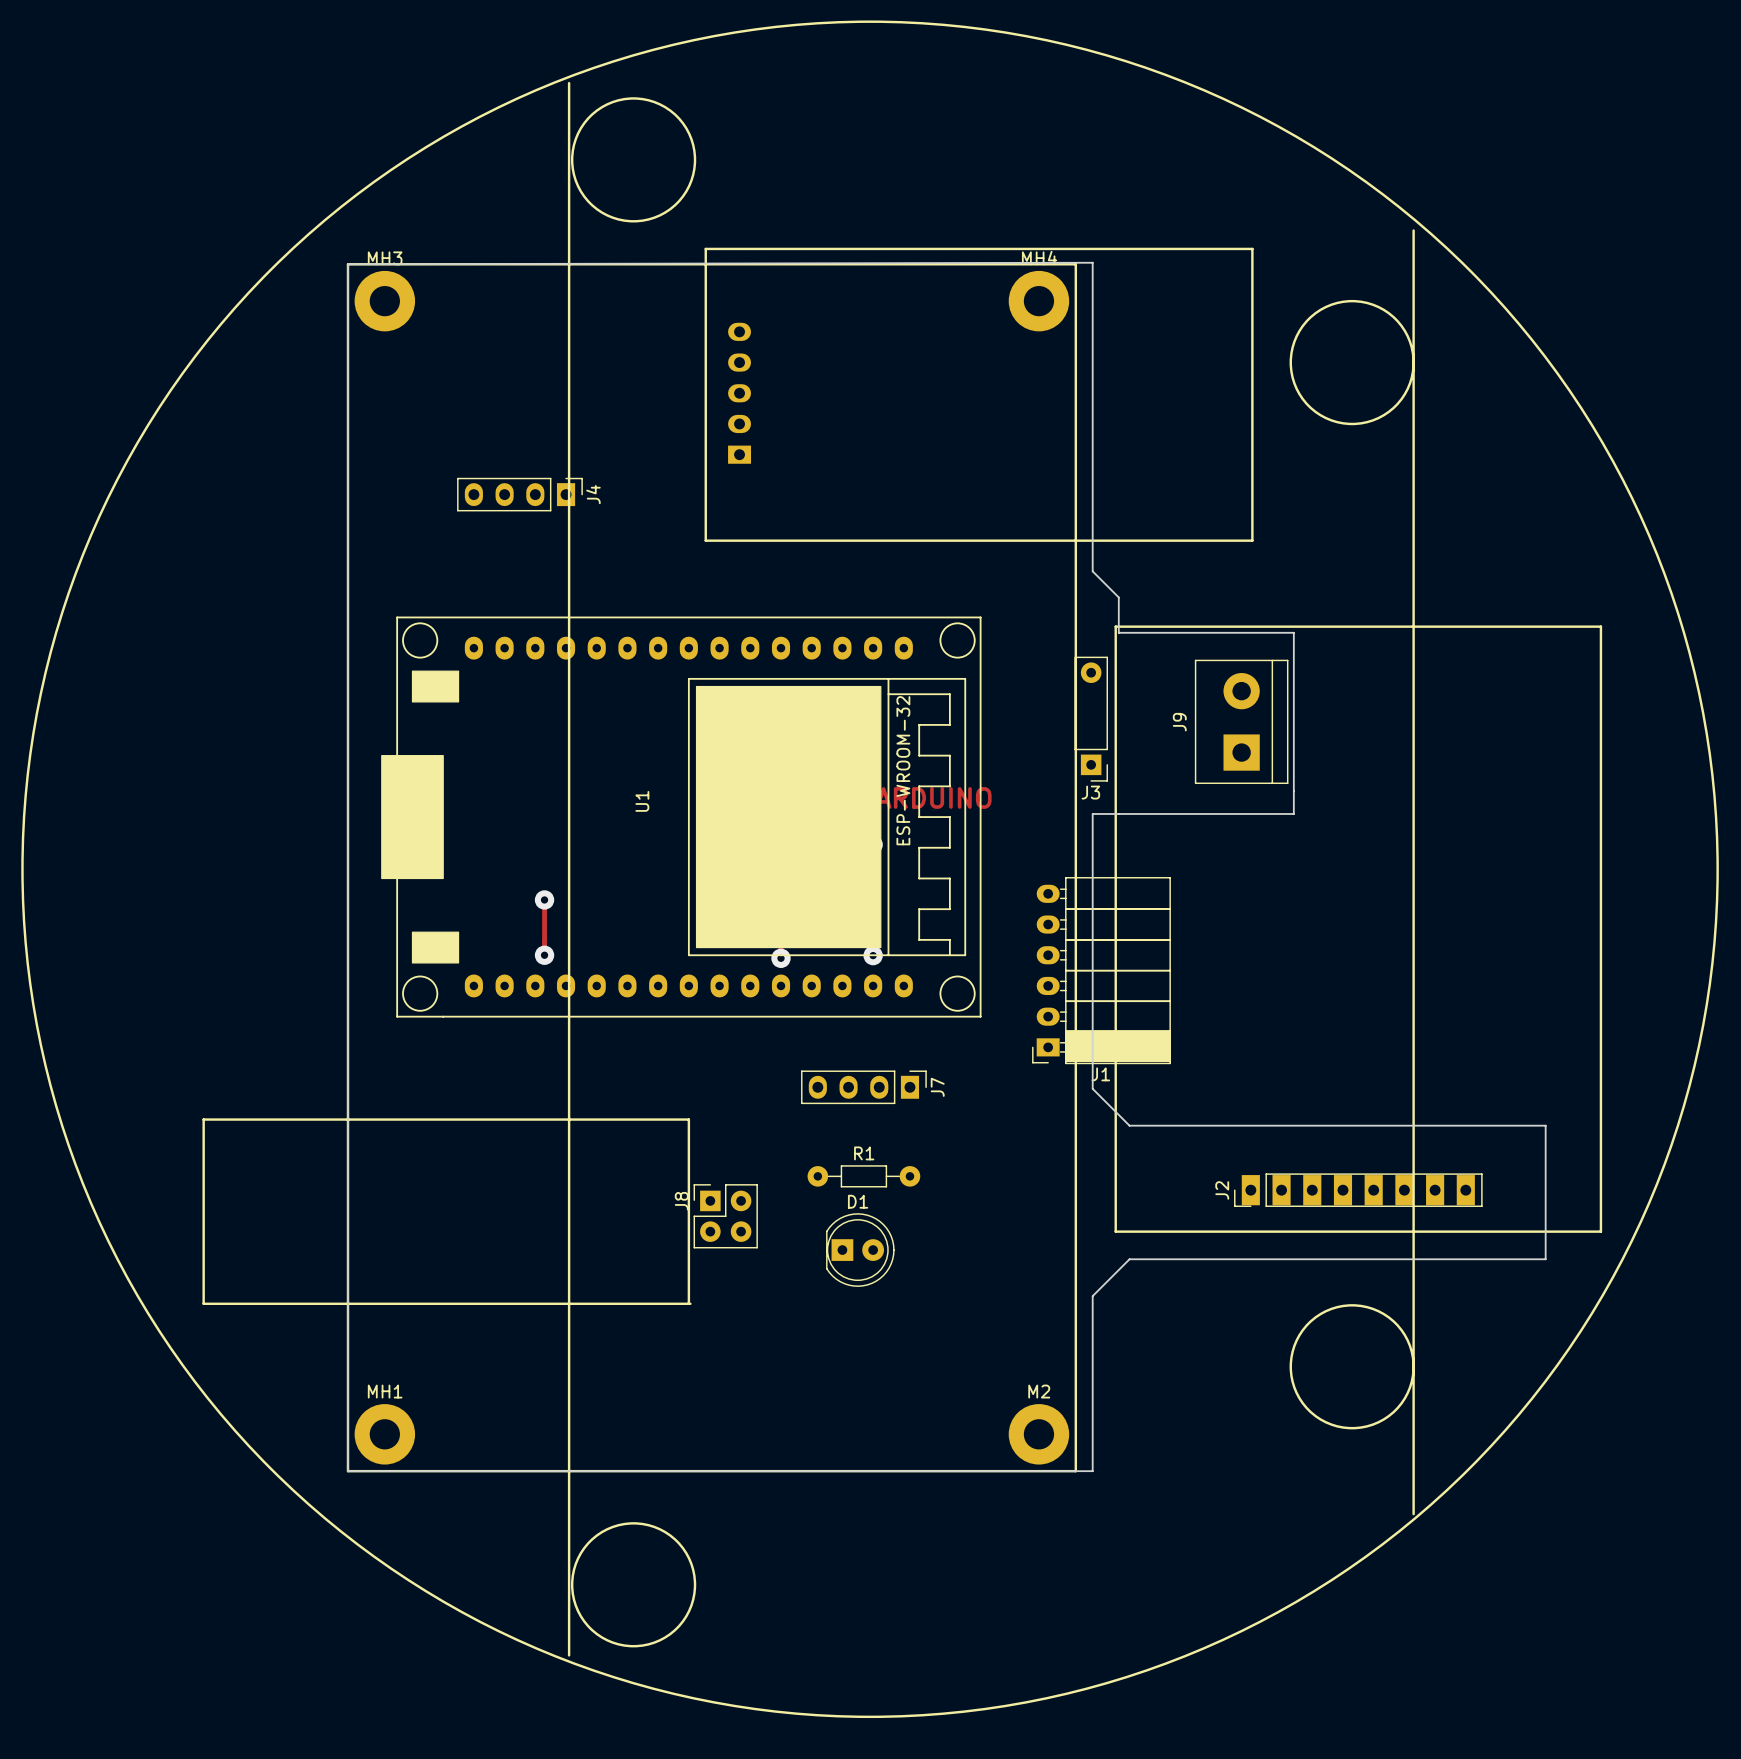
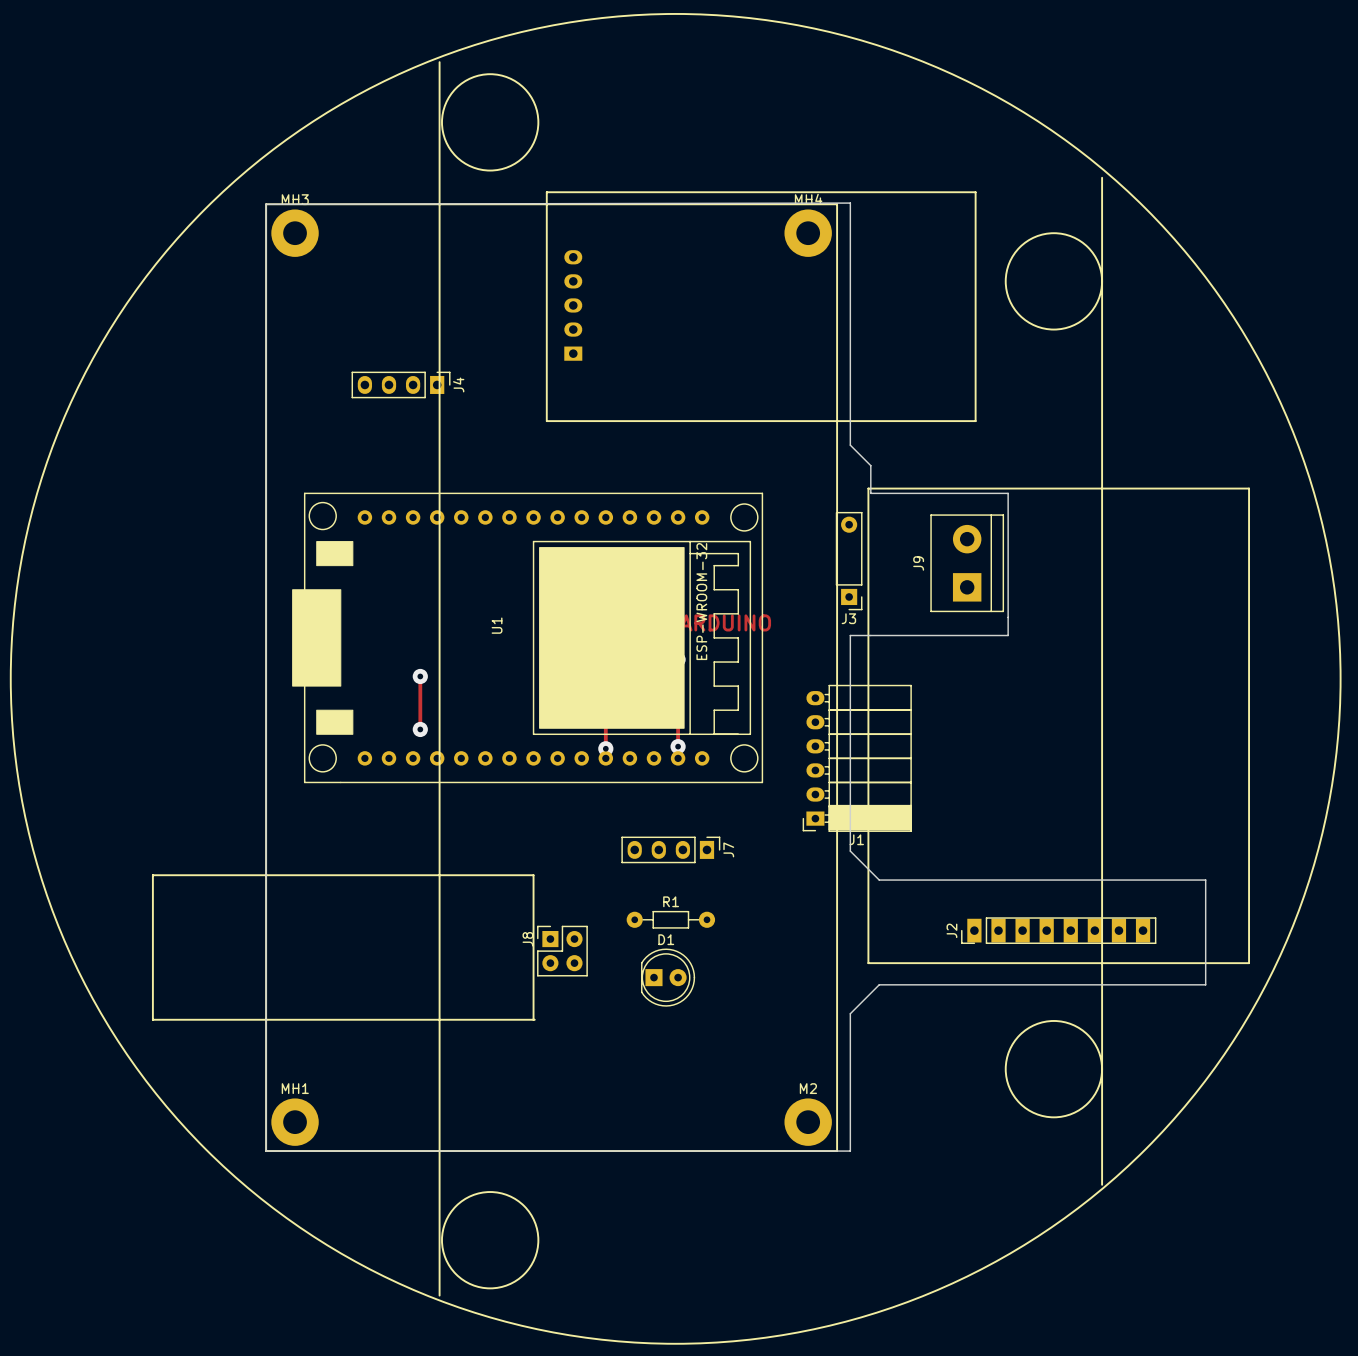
U1 footprint: [381, 616, 982, 1018] -> [292, 492, 764, 784]
track: none -> (420, 676) (420, 702)
via: none -> (420, 676)
via: (544, 899) -> none
track: (544, 933) (544, 955) -> none
via: none -> (420, 729)
via: (544, 955) -> none

